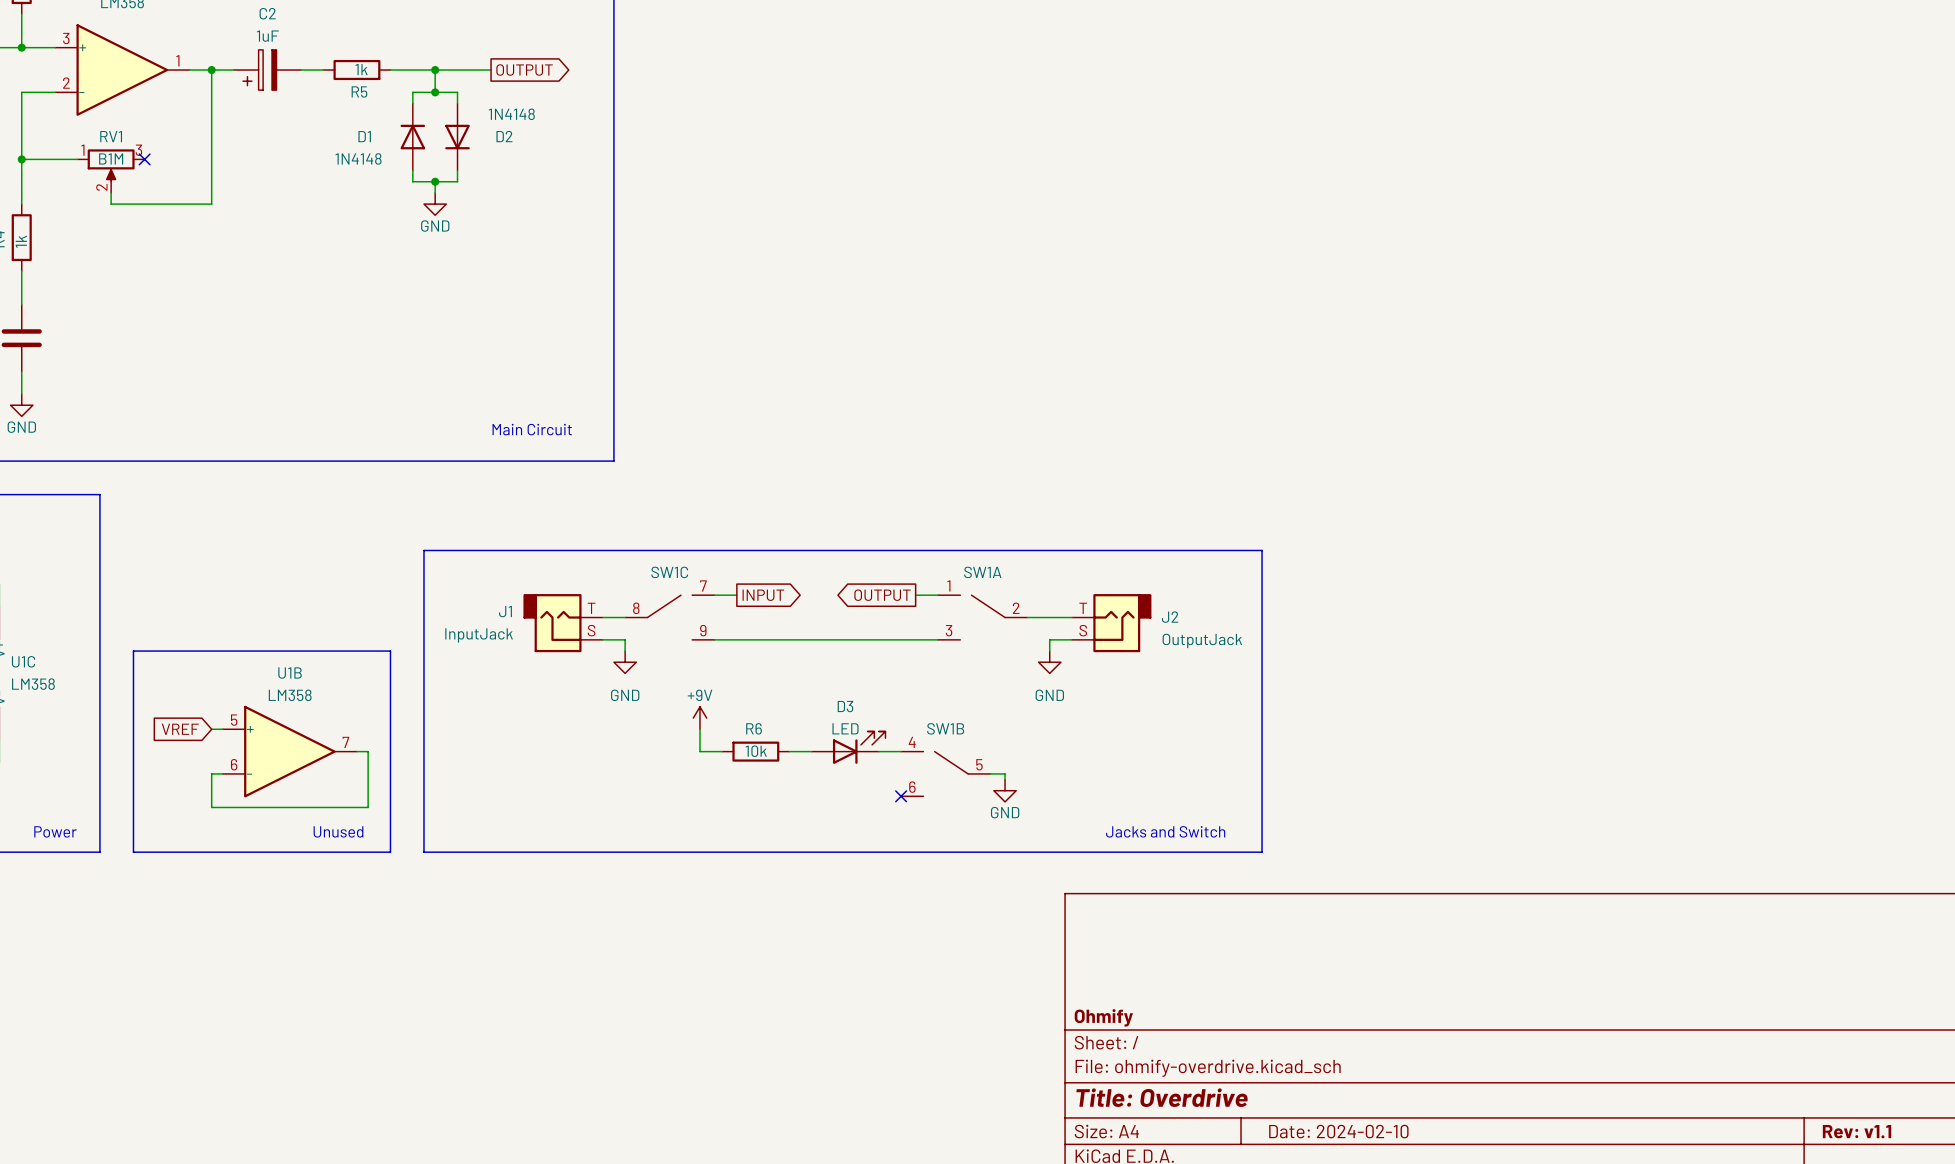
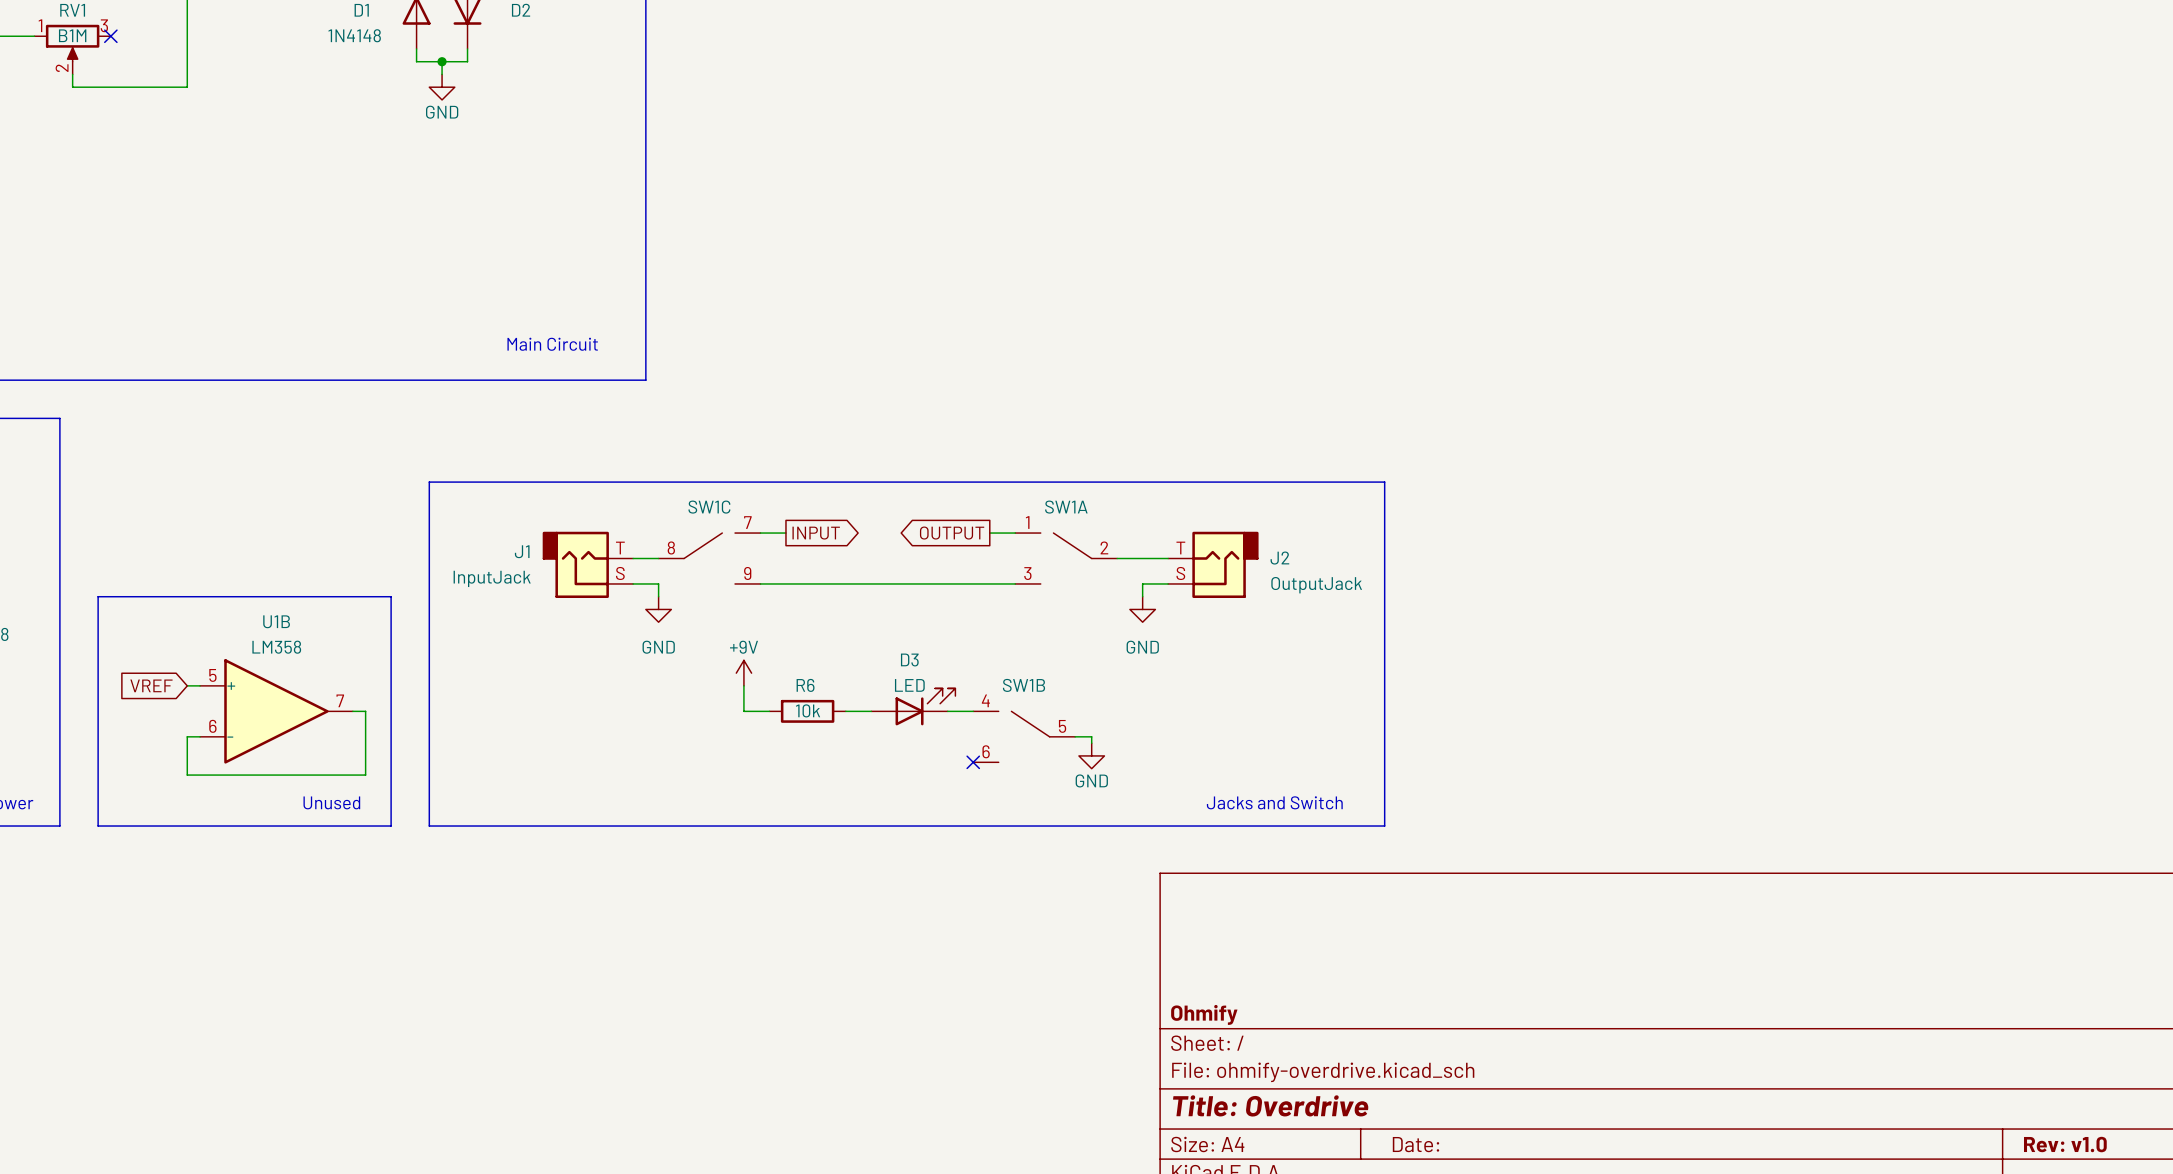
title block: Date: 2024-02-10 (1338, 1131) -> Date: (1415, 1144)
title block: Rev: v1.1 (1857, 1131) -> Rev: v1.0 (2065, 1144)

